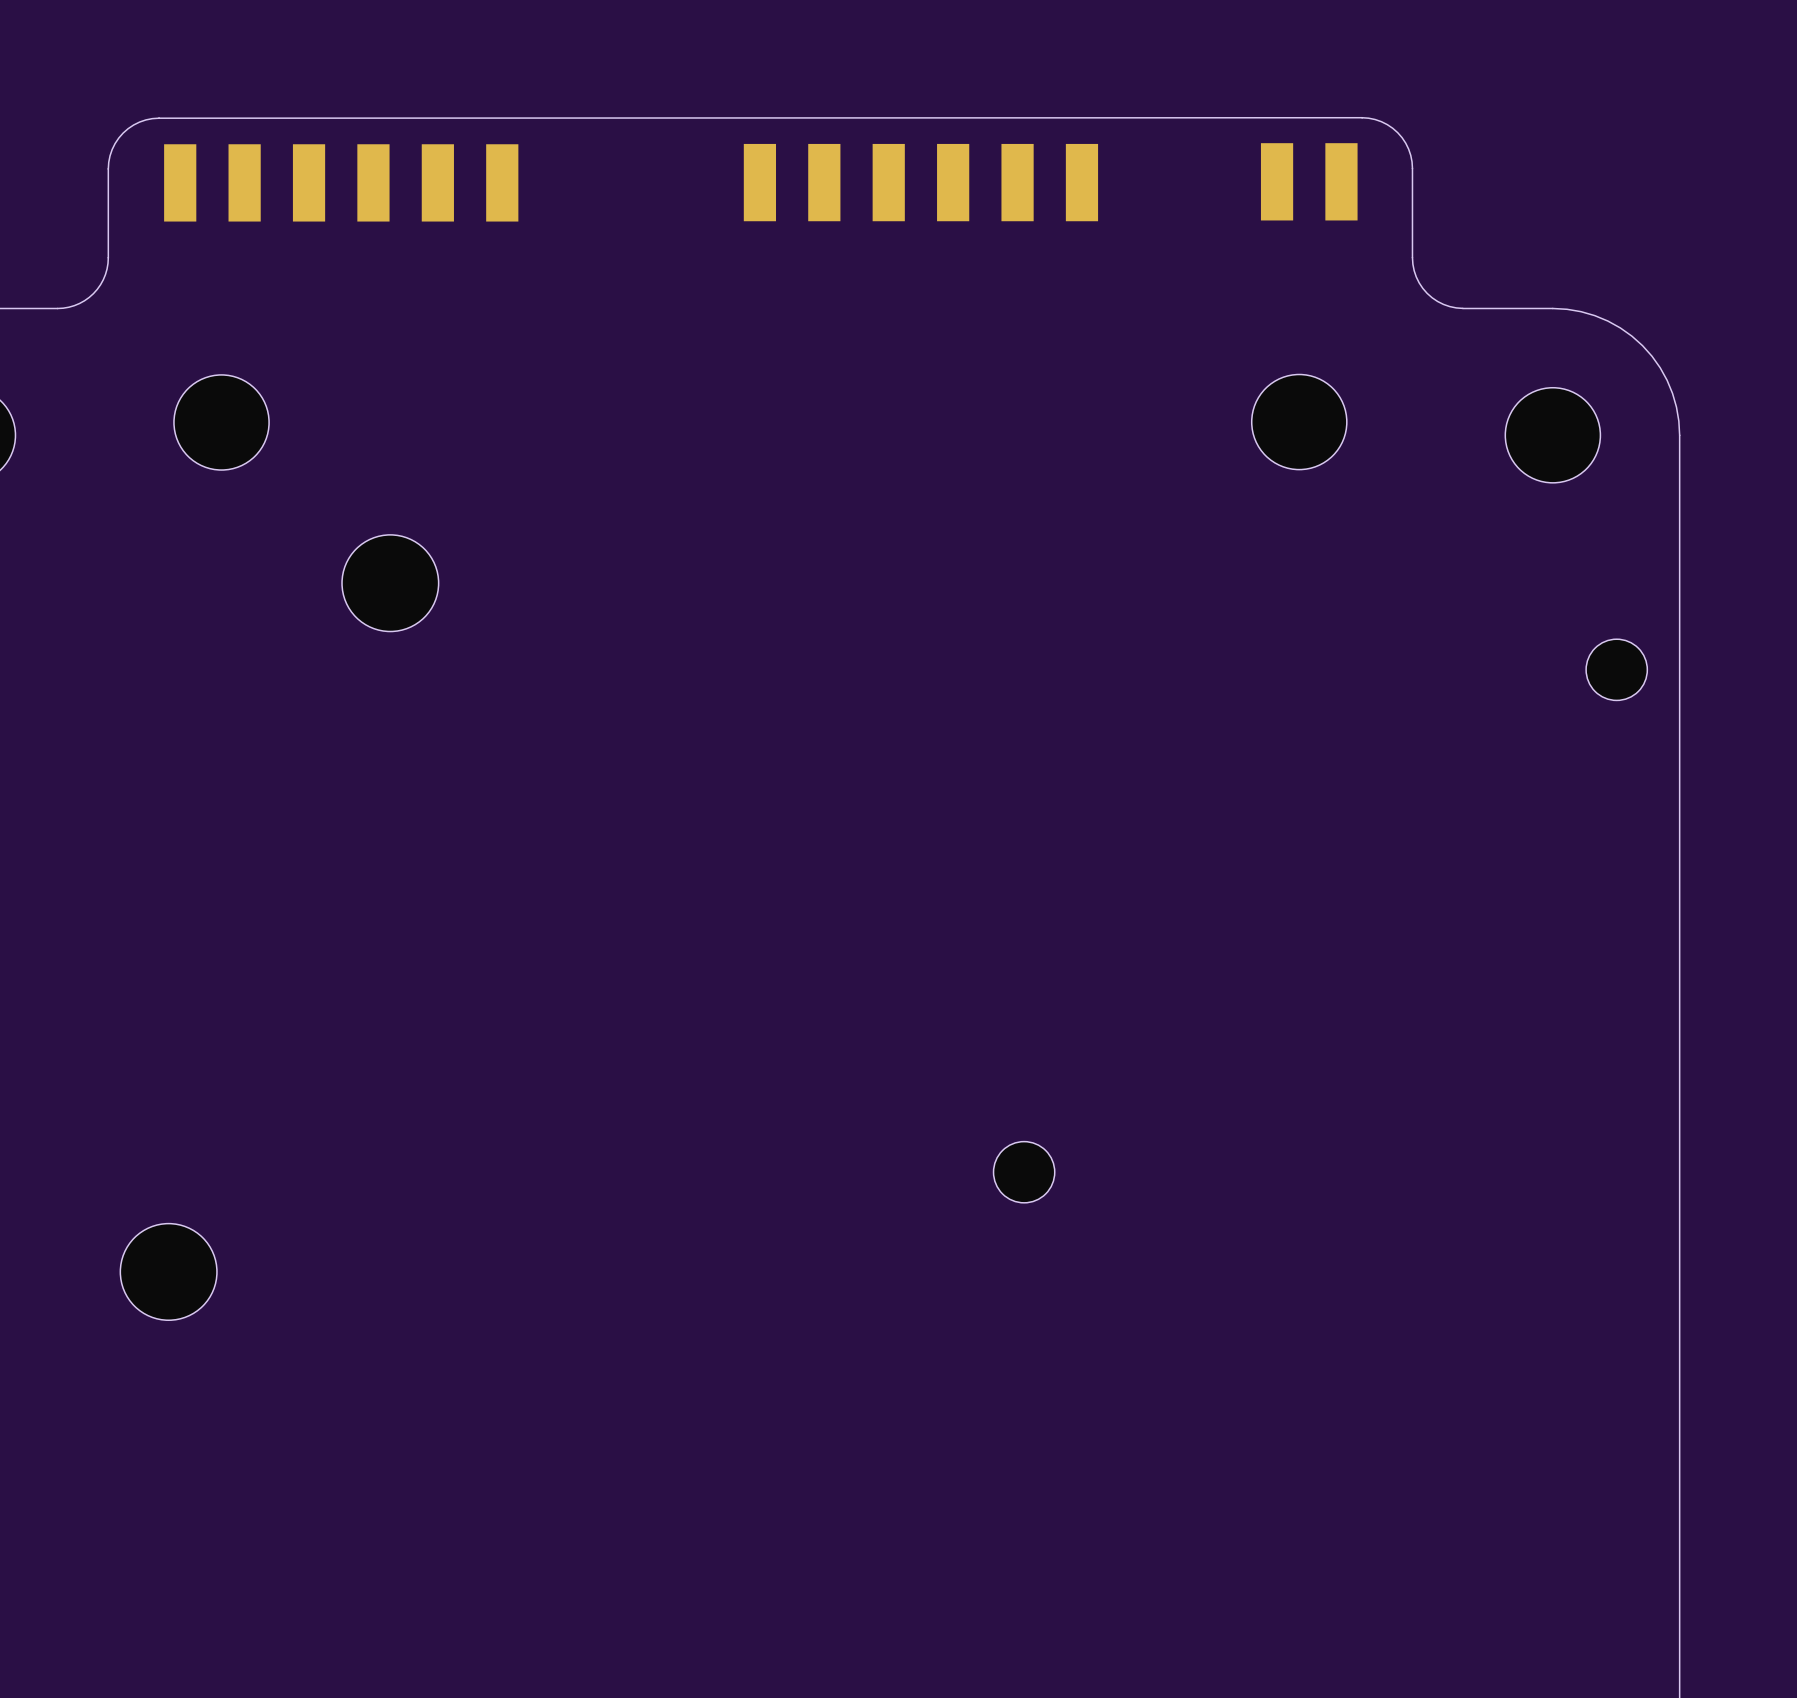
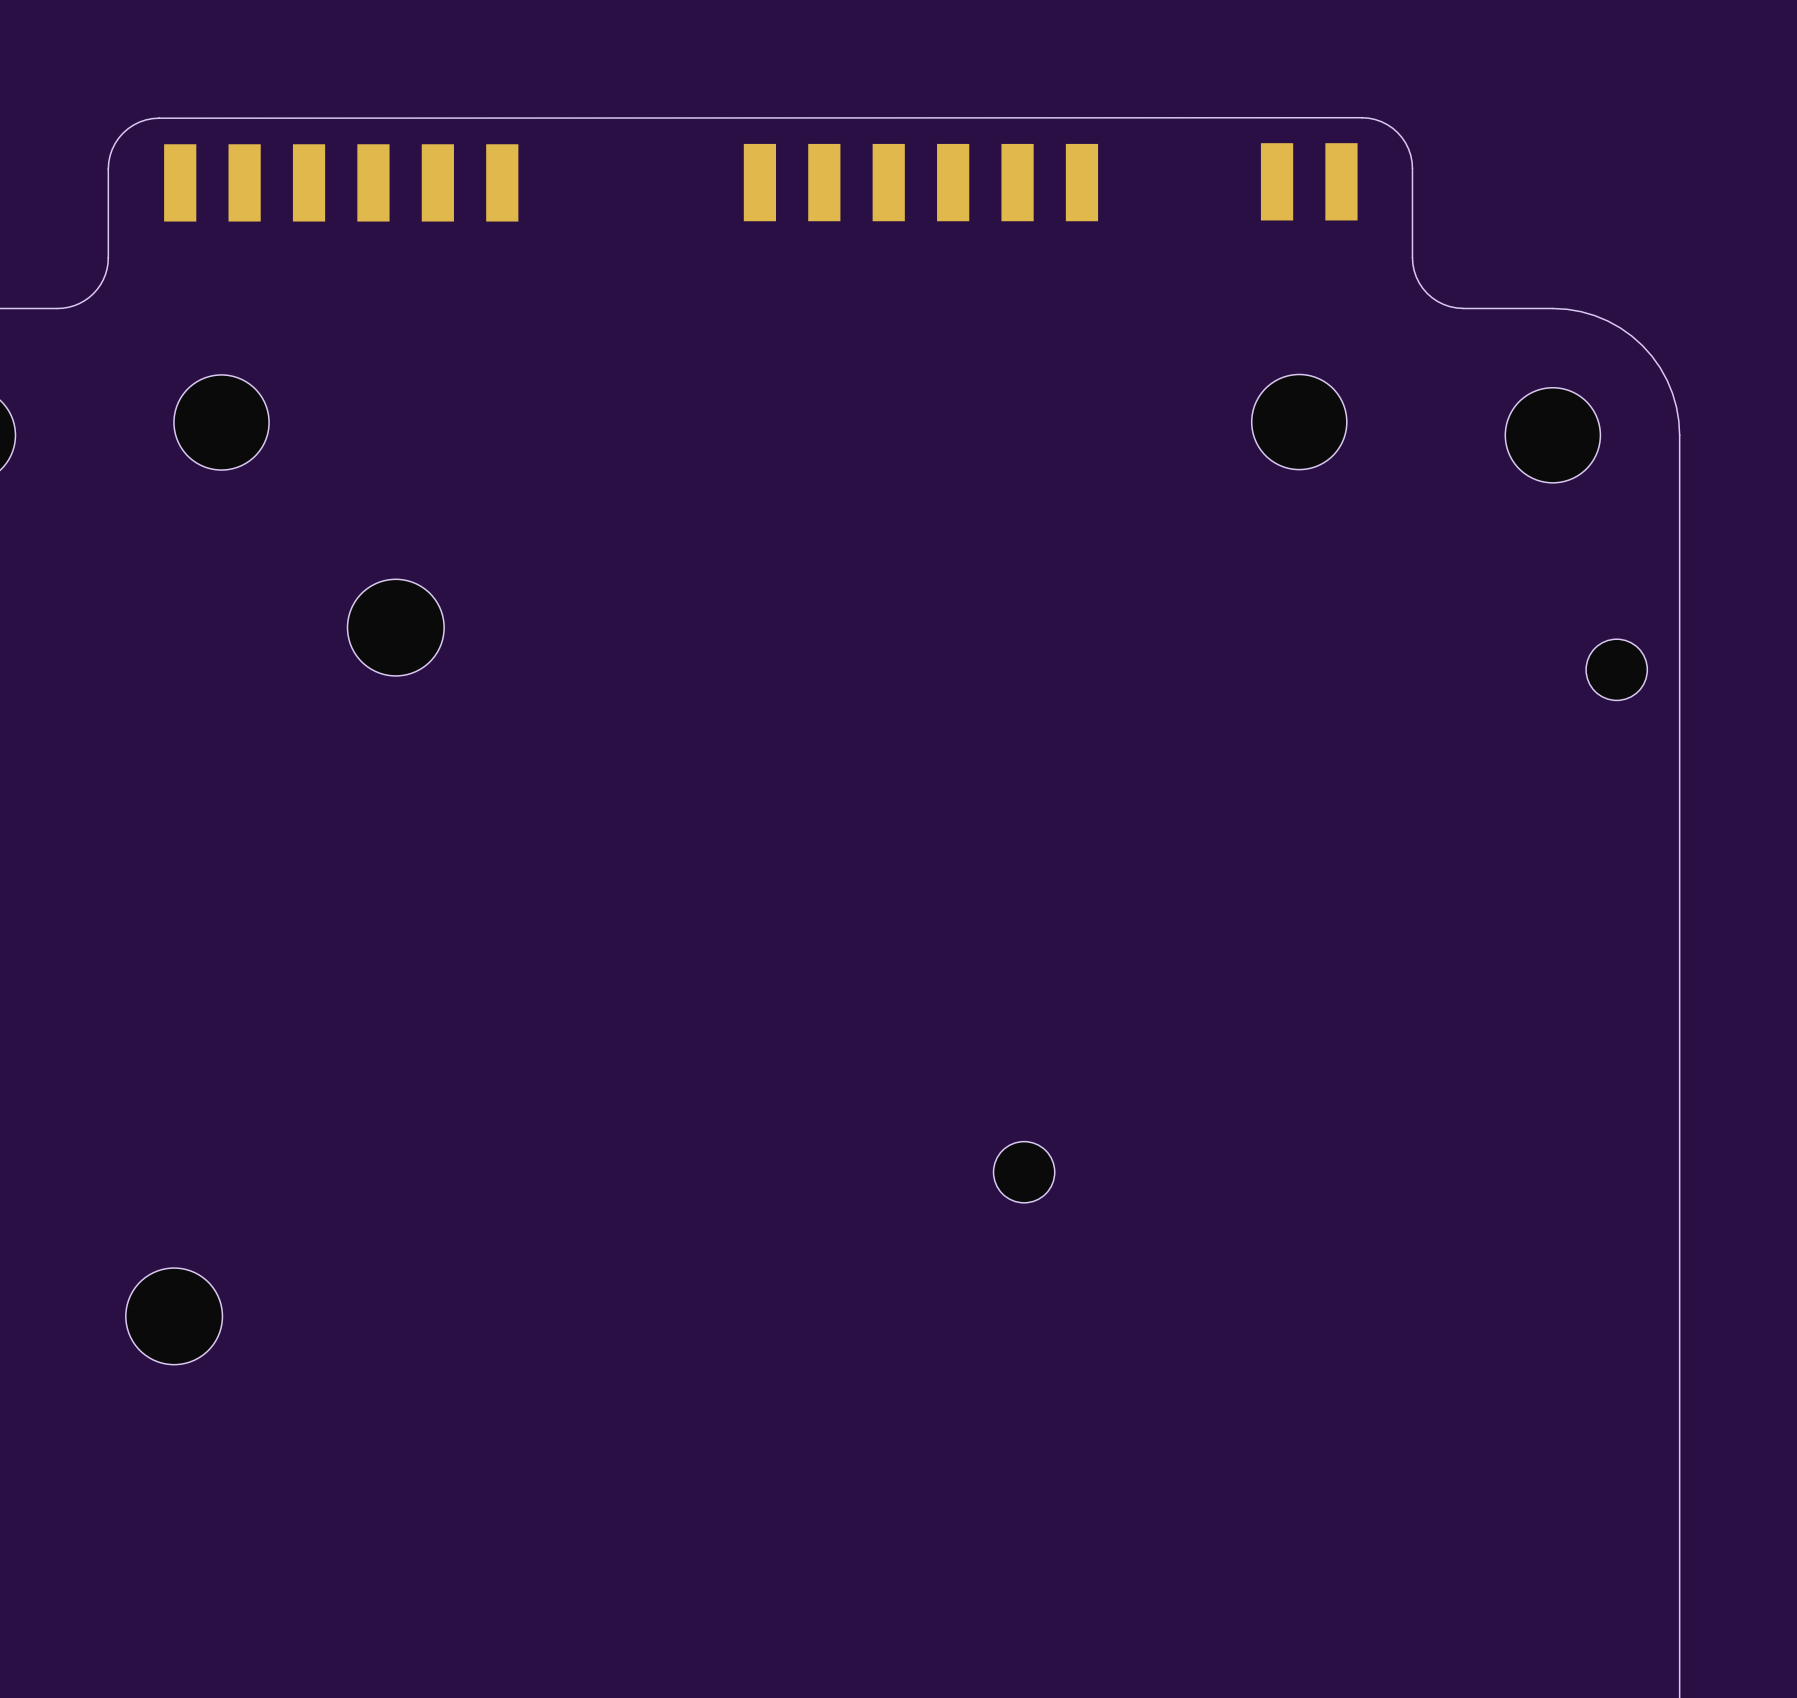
part position: (390, 583) -> (395, 627)
part position: (168, 1271) -> (174, 1316)

